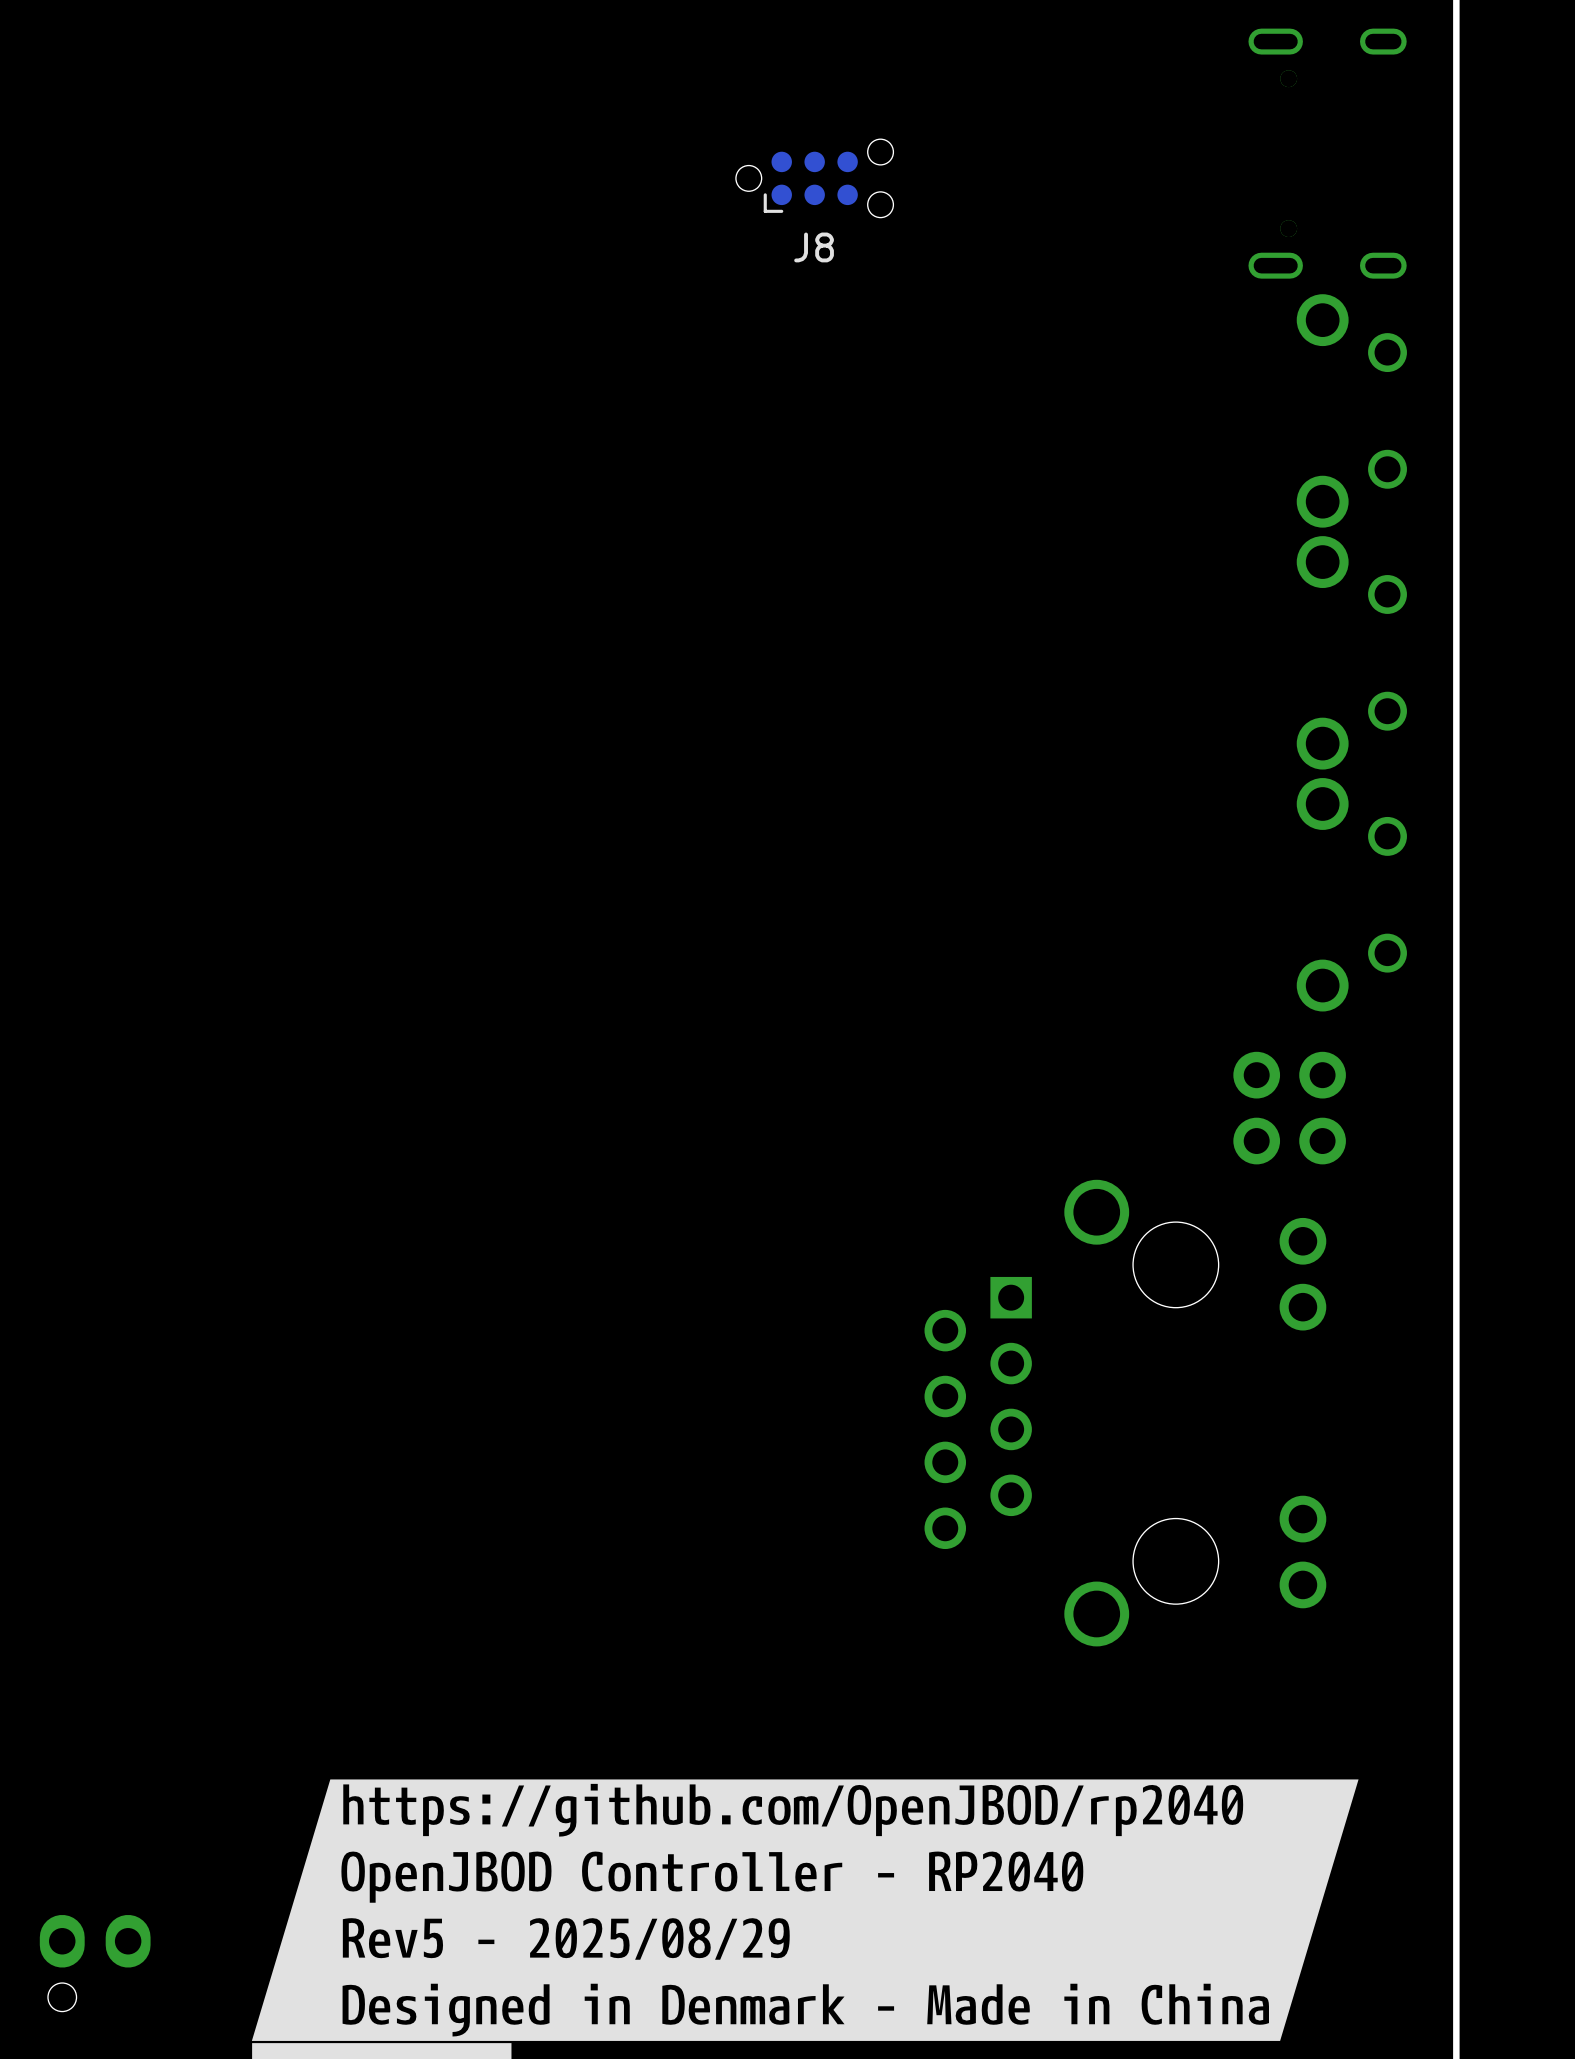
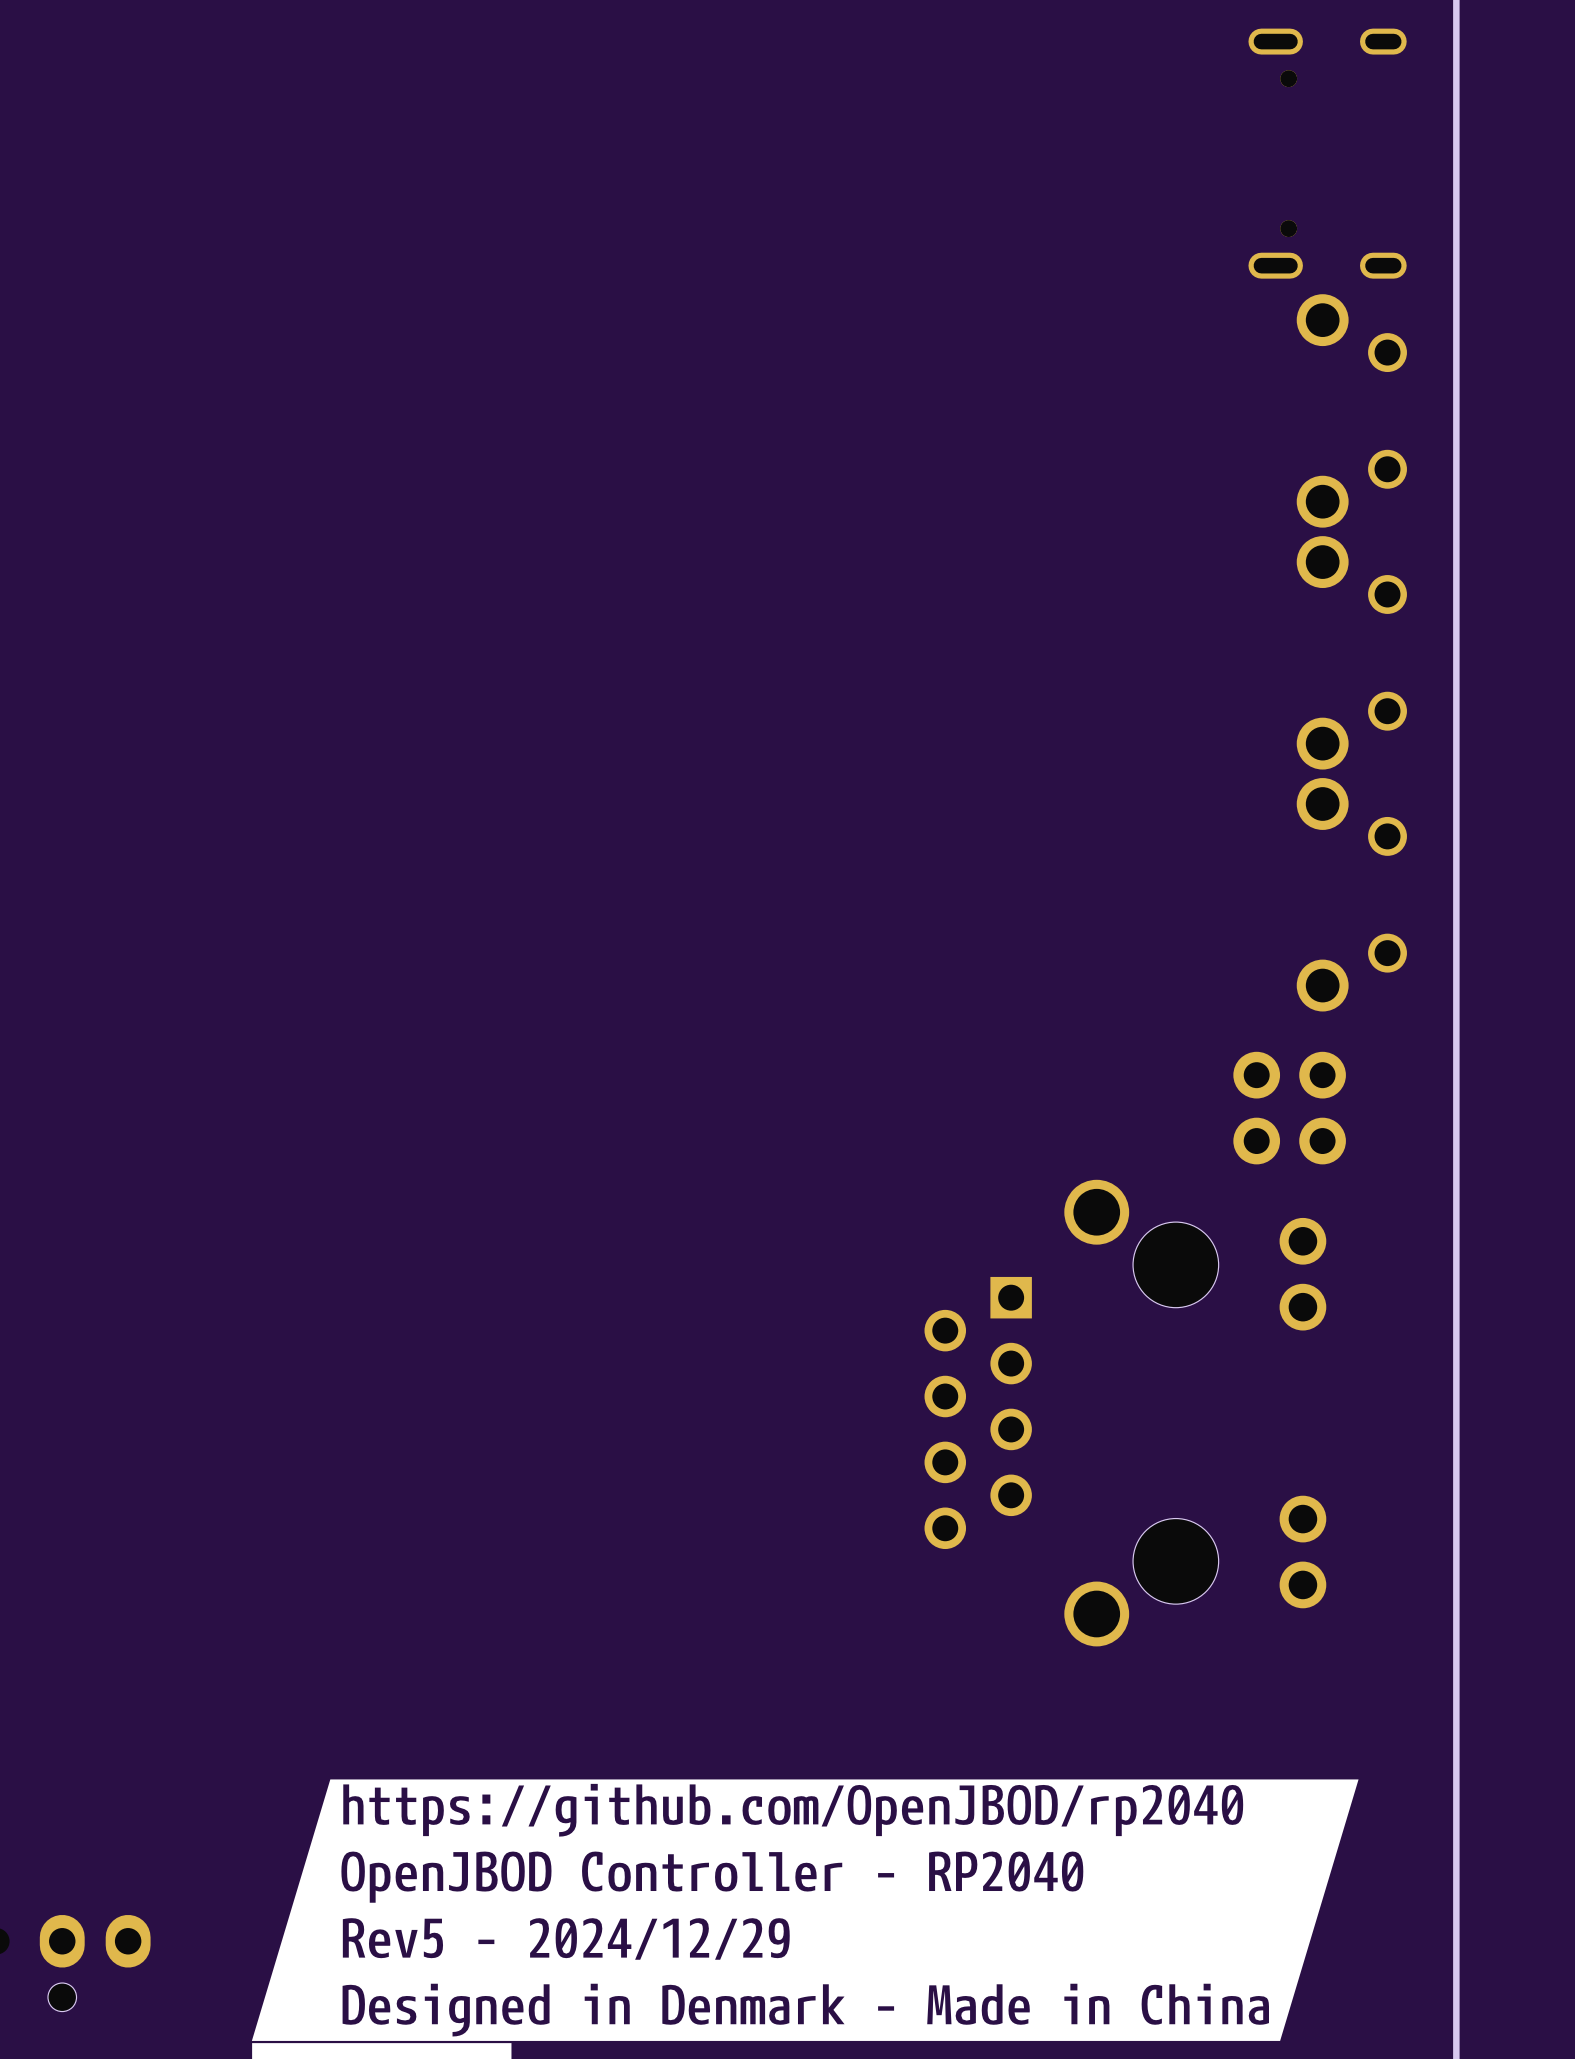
J8: (814, 178) -> none
drawing shape: [251, 1779, 1359, 2041] -> [251, 1779, 1359, 2041]

